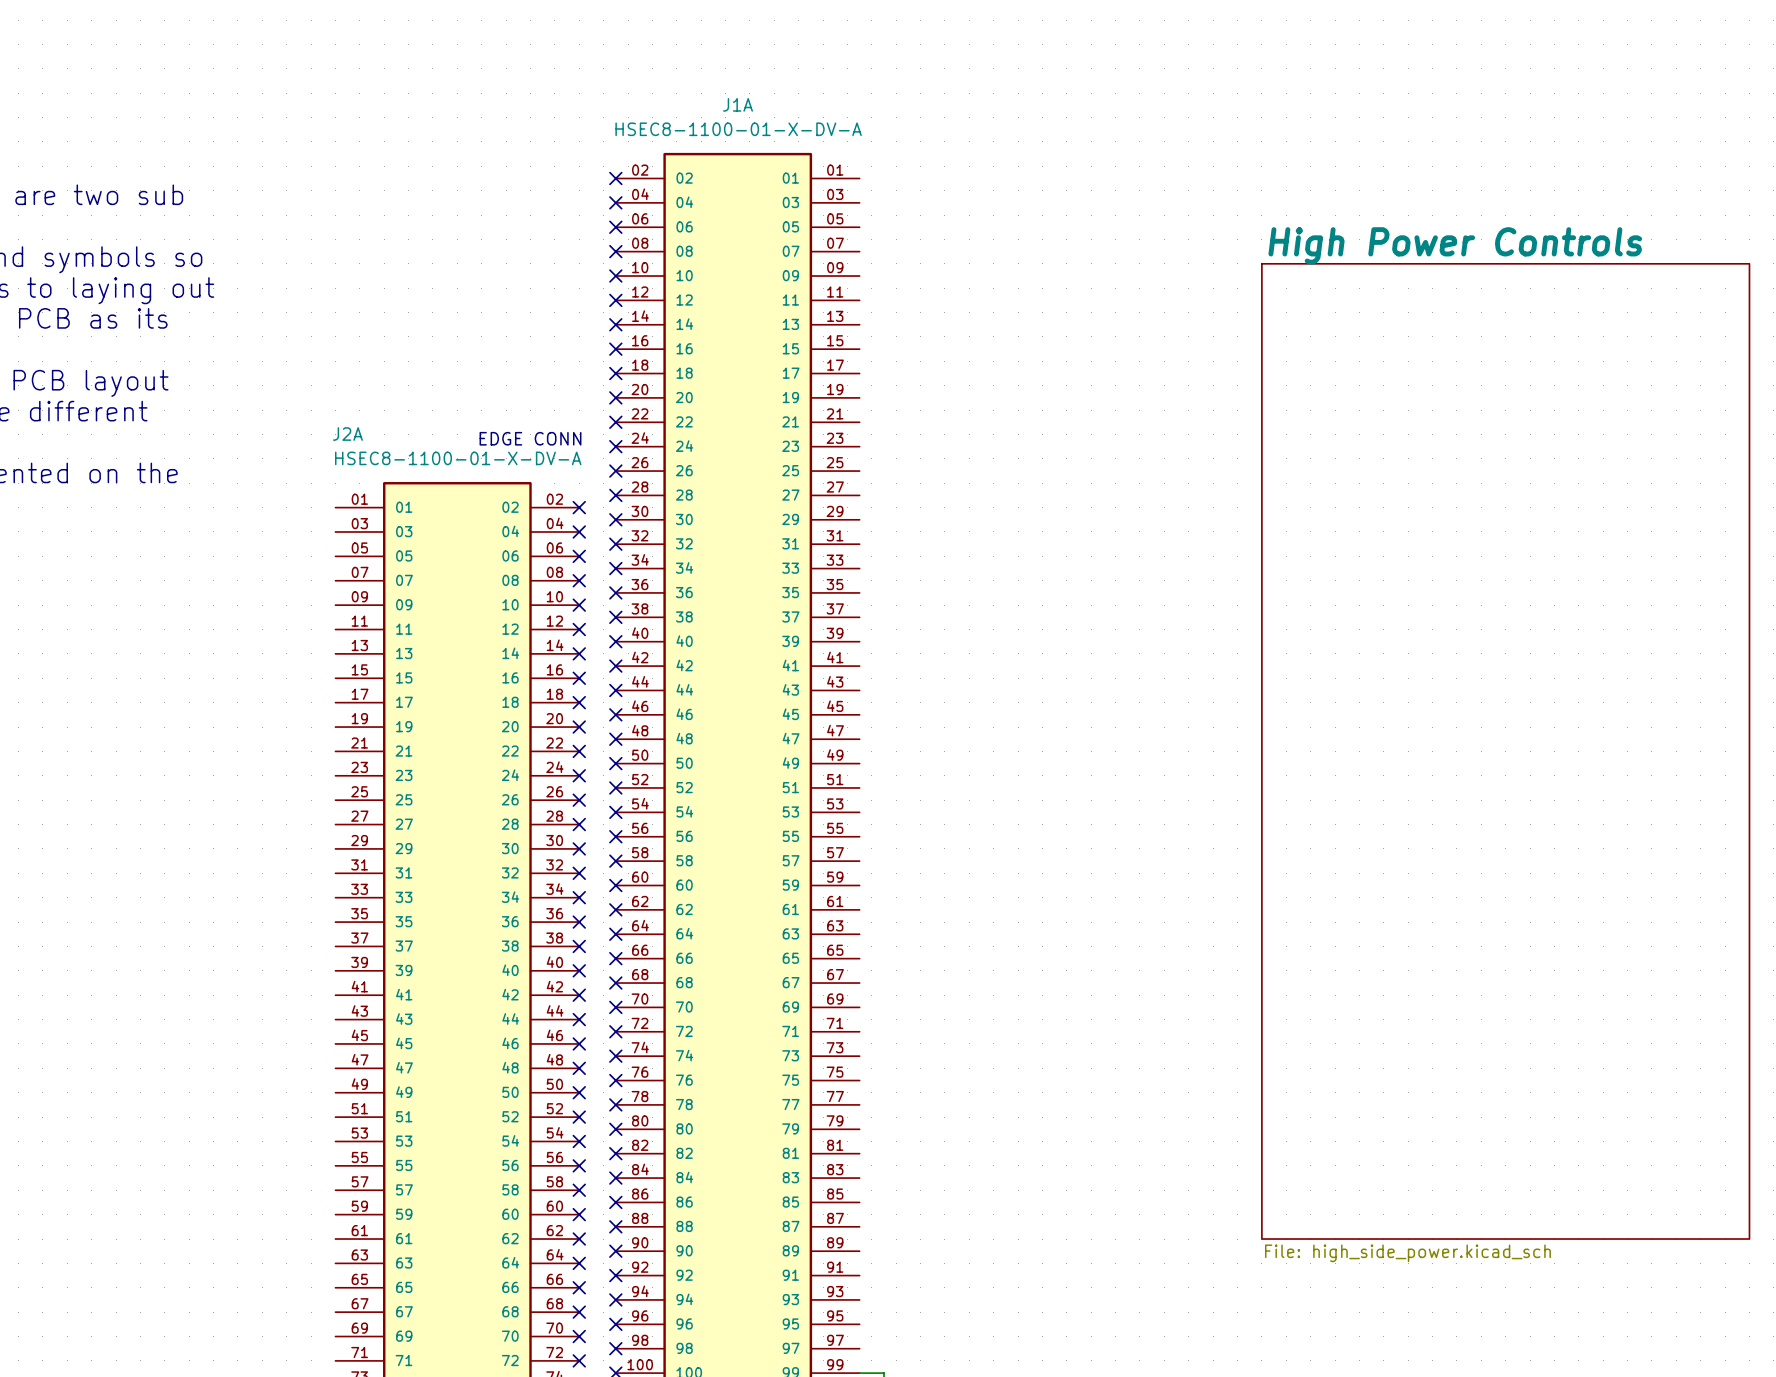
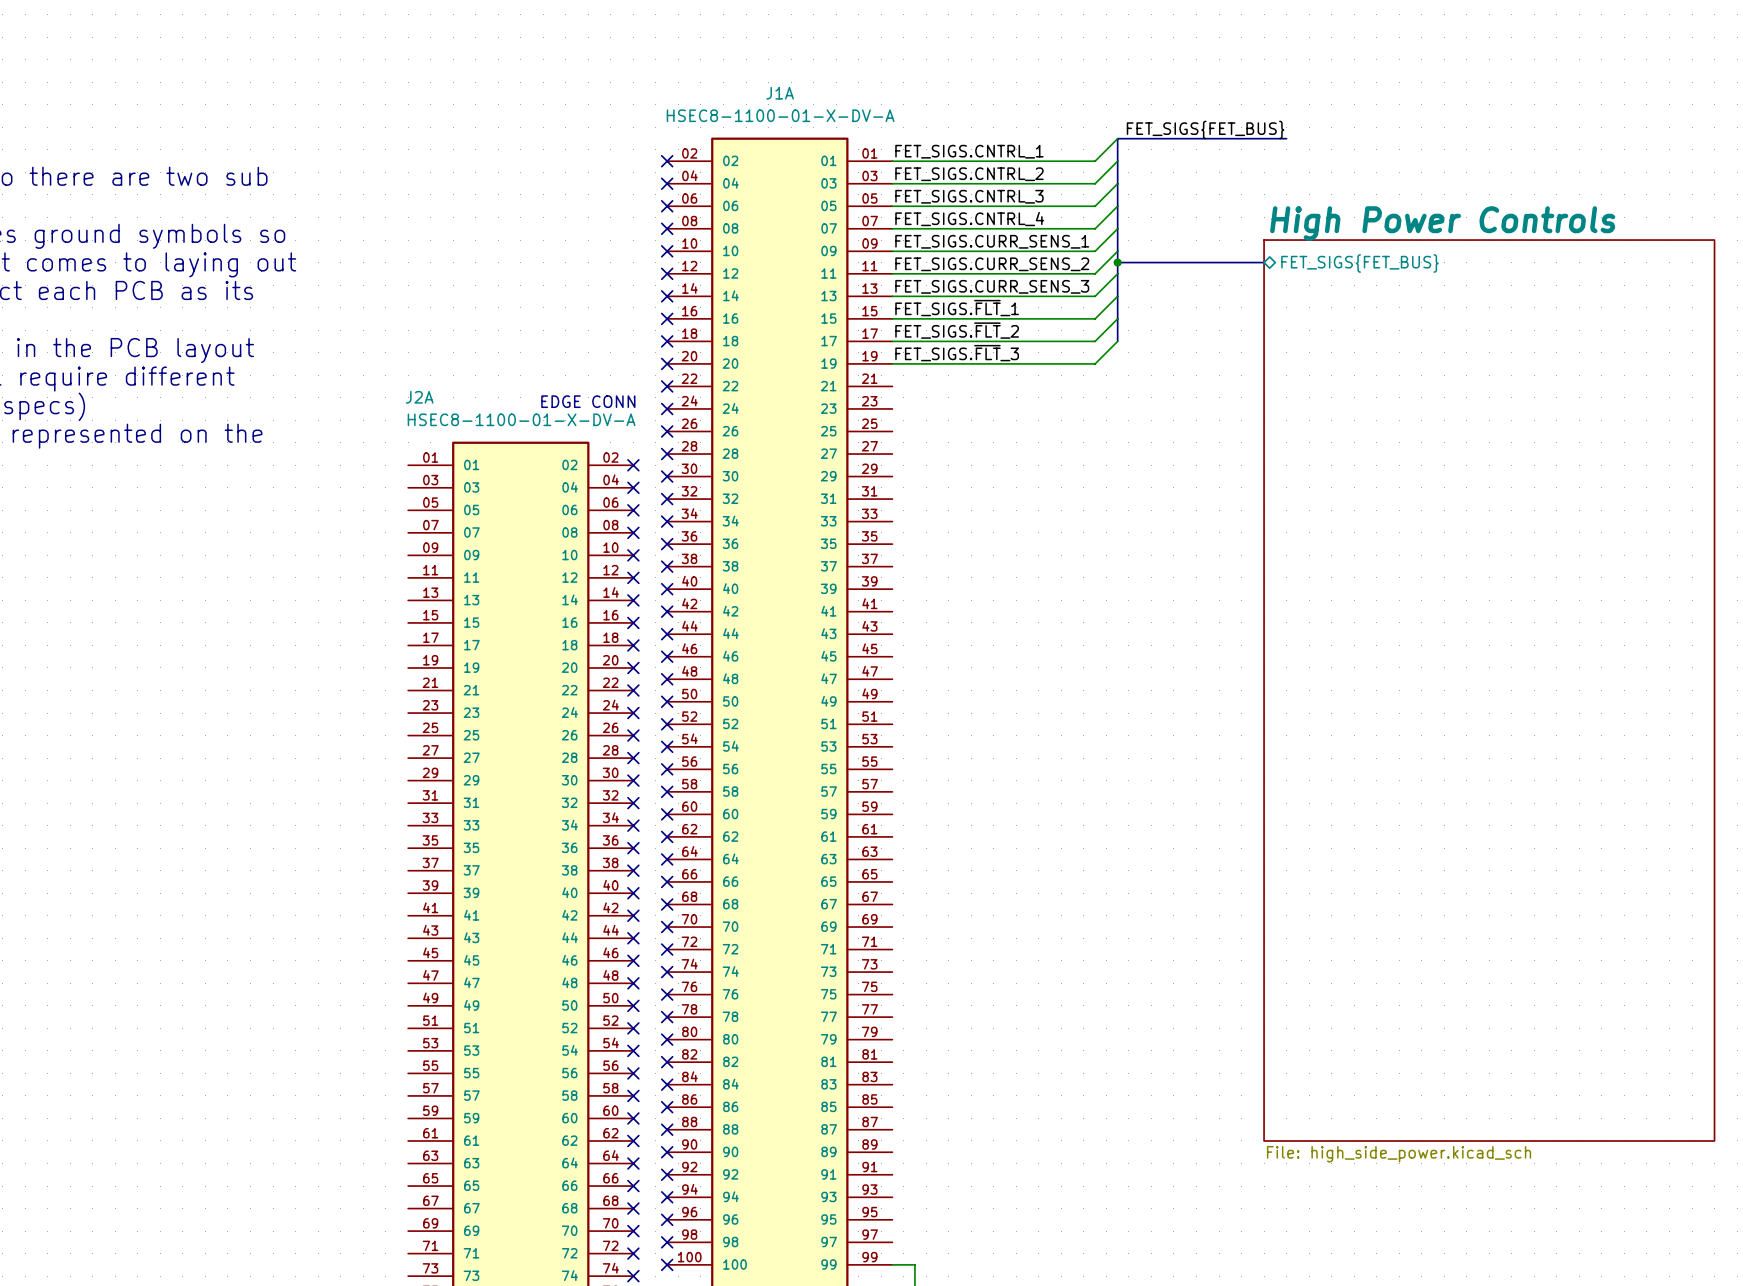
label: none -> FET_SIGS{FET_BUS} (1205, 129)
wire: none -> (1117, 138) (1095, 161) (892, 161)
bus: none -> (1286, 138) (1117, 138) (1117, 341)
label: none -> FET_SIGS.CNTRL_1 (969, 151)
wire: none -> (1117, 161) (1095, 183) (892, 183)
label: none -> FET_SIGS.CNTRL_2 (969, 174)
wire: none -> (1117, 183) (1095, 206) (892, 206)
label: none -> FET_SIGS.CNTRL_3 (969, 196)
wire: none -> (1117, 206) (1095, 228) (892, 228)
label: none -> FET_SIGS.CNTRL_4 (969, 219)
wire: none -> (1117, 228) (1095, 251) (892, 251)
label: none -> FET_SIGS.CURR_SENS_1 (992, 241)
wire: none -> (1117, 251) (1095, 273) (892, 273)
bus: none -> (1117, 262) (1264, 262)
junction: none -> (1117, 262)
sheet pin: none -> FET_SIGS{FET_BUS} (1359, 263)
label: none -> FET_SIGS.CURR_SENS_2 (992, 264)
wire: none -> (1117, 273) (1095, 296) (892, 296)
label: none -> FET_SIGS.CURR_SENS_3 (992, 286)
wire: none -> (1117, 296) (1095, 318) (892, 318)
label: none -> FET_SIGS.~{FLT}_1 (957, 308)
wire: none -> (1117, 318) (1095, 341) (892, 341)
label: none -> FET_SIGS.~{FLT}_2 (957, 330)
wire: none -> (1117, 341) (1095, 363) (892, 363)
label: none -> FET_SIGS.~{FLT}_3 (957, 353)

